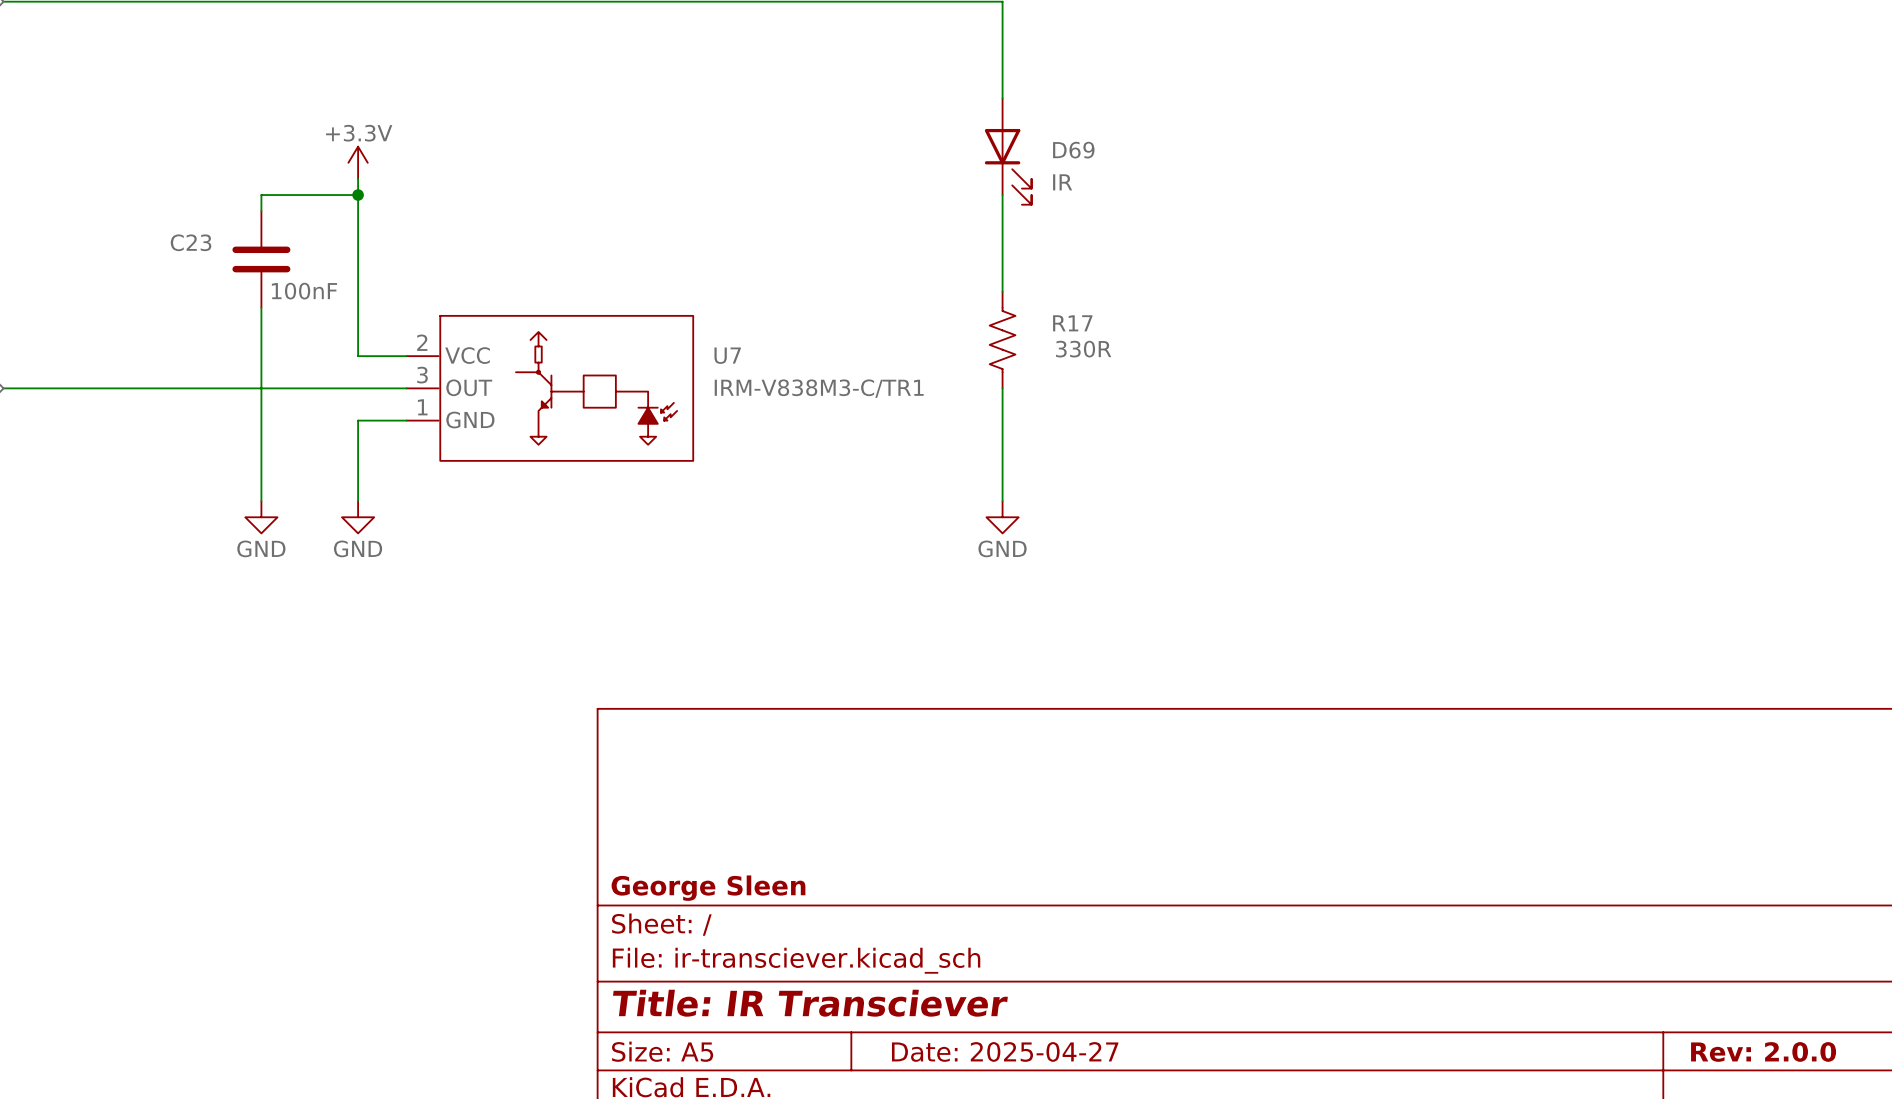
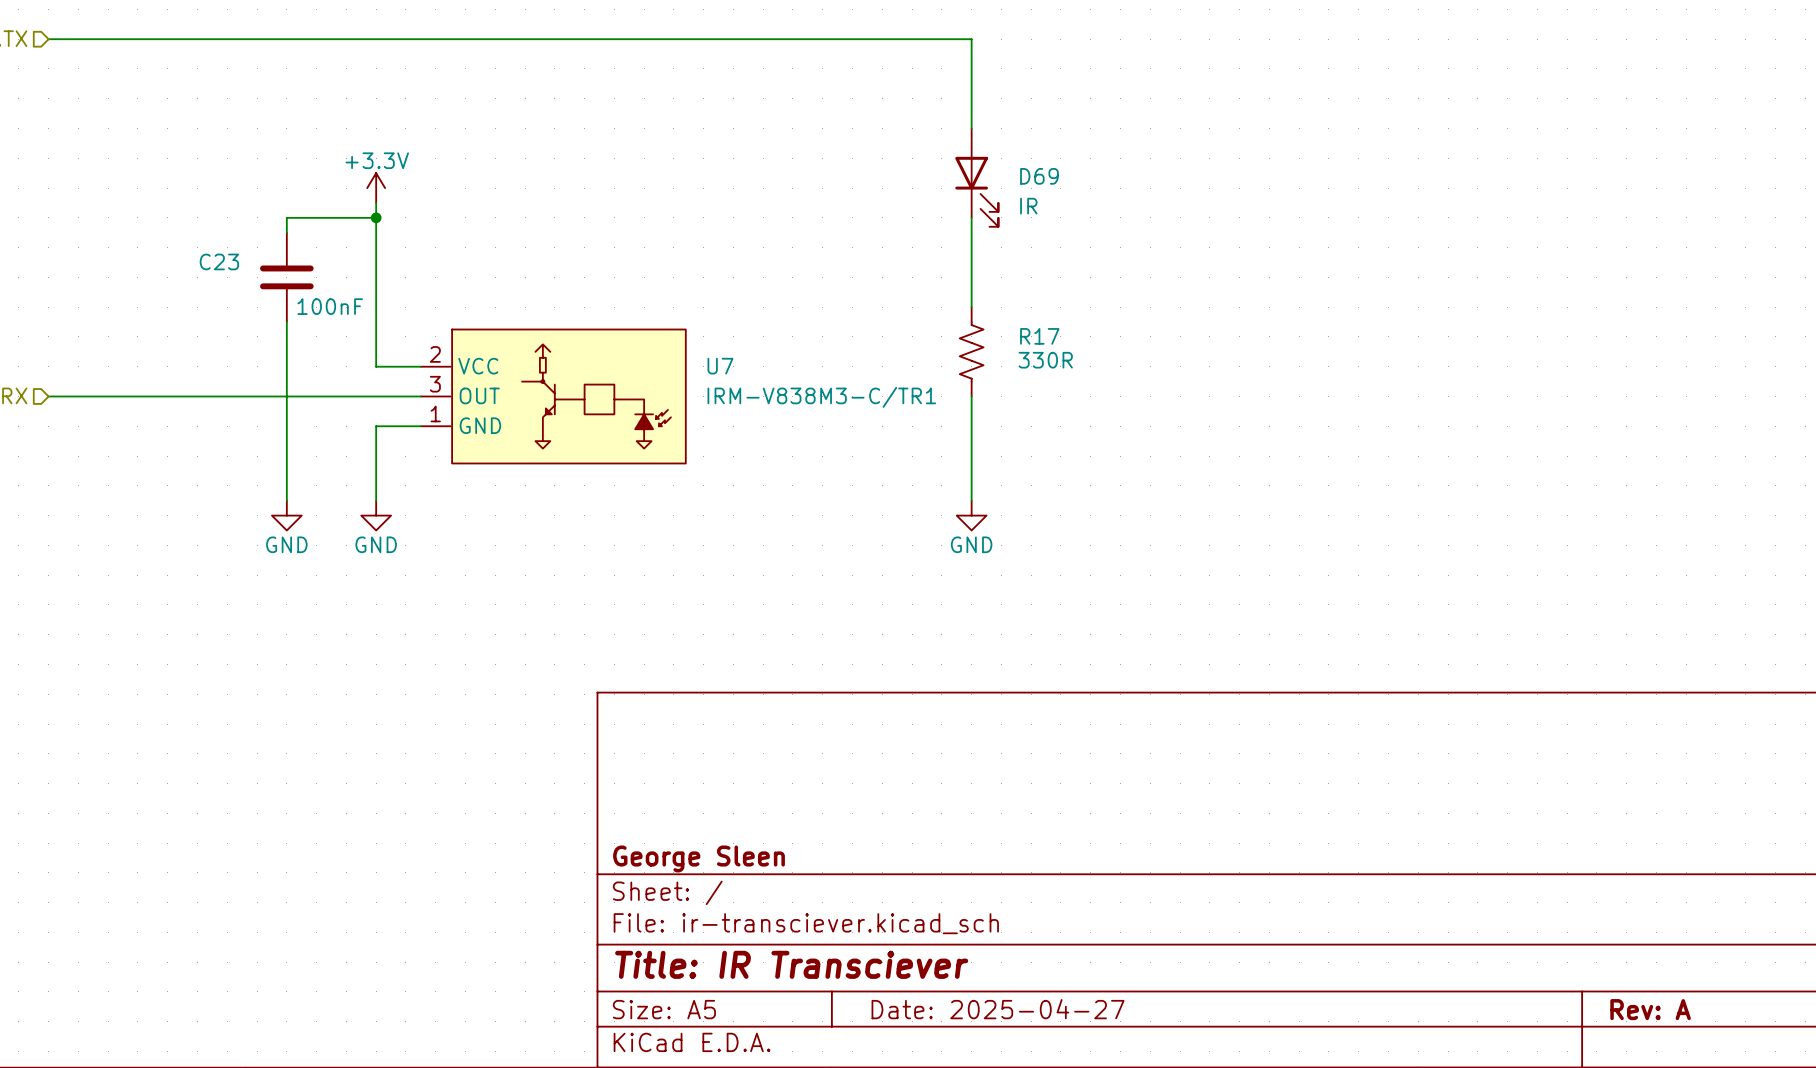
title block: Rev: 2.0.0 (1763, 1051) -> Rev: A (1650, 1009)

